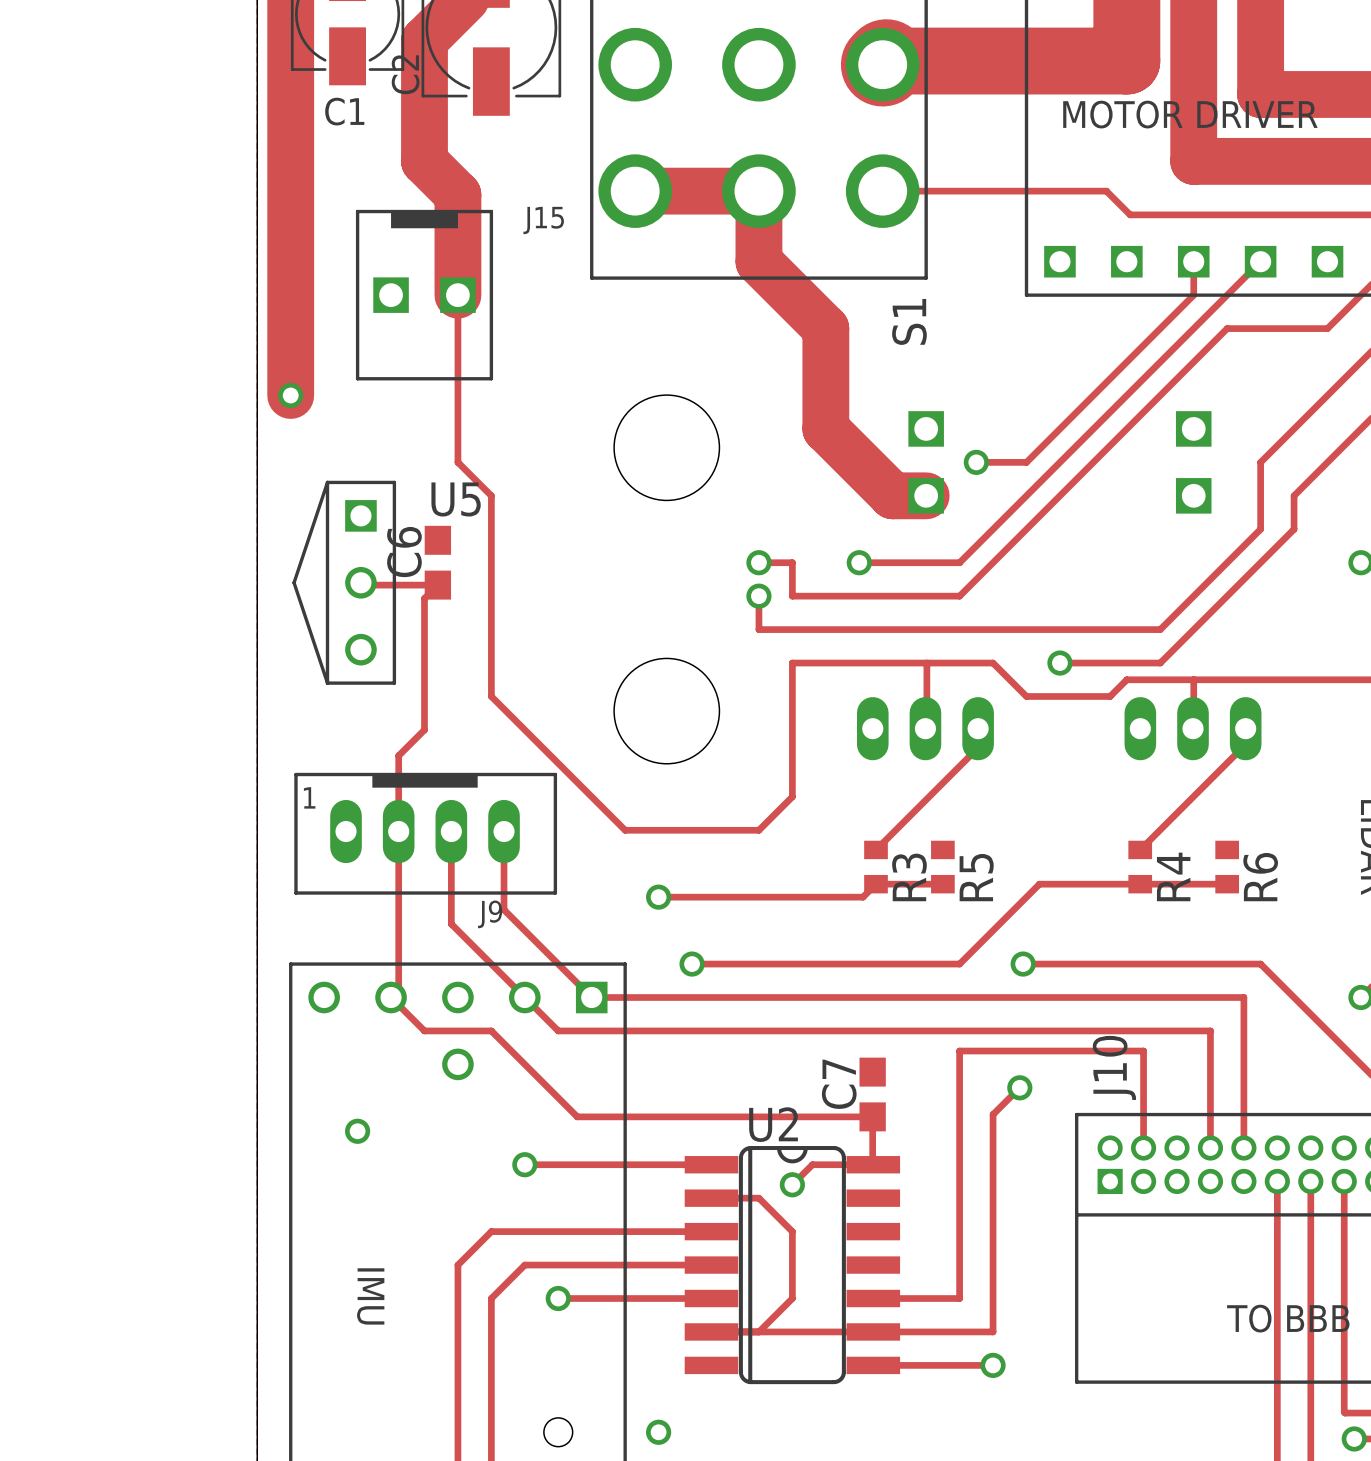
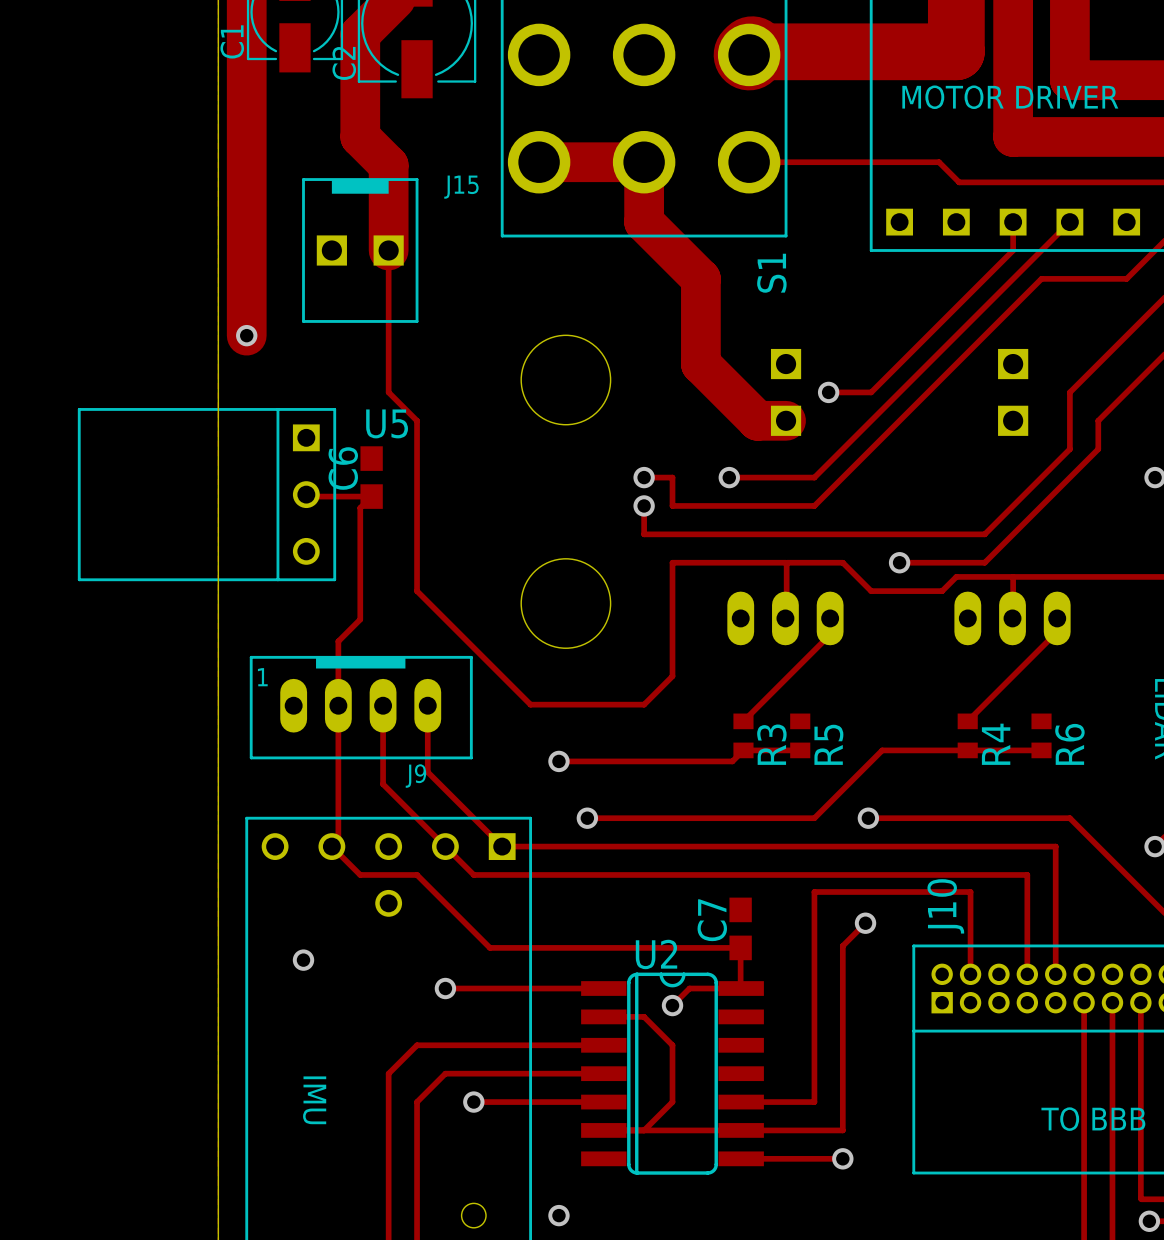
C1 name rotation: 0° (344, 111) -> 90° counterclockwise (232, 41)
C1 name position: C1 (344, 111) -> C1 (232, 41)
U5 footprint: [292, 480, 397, 685] -> [77, 408, 337, 582]

